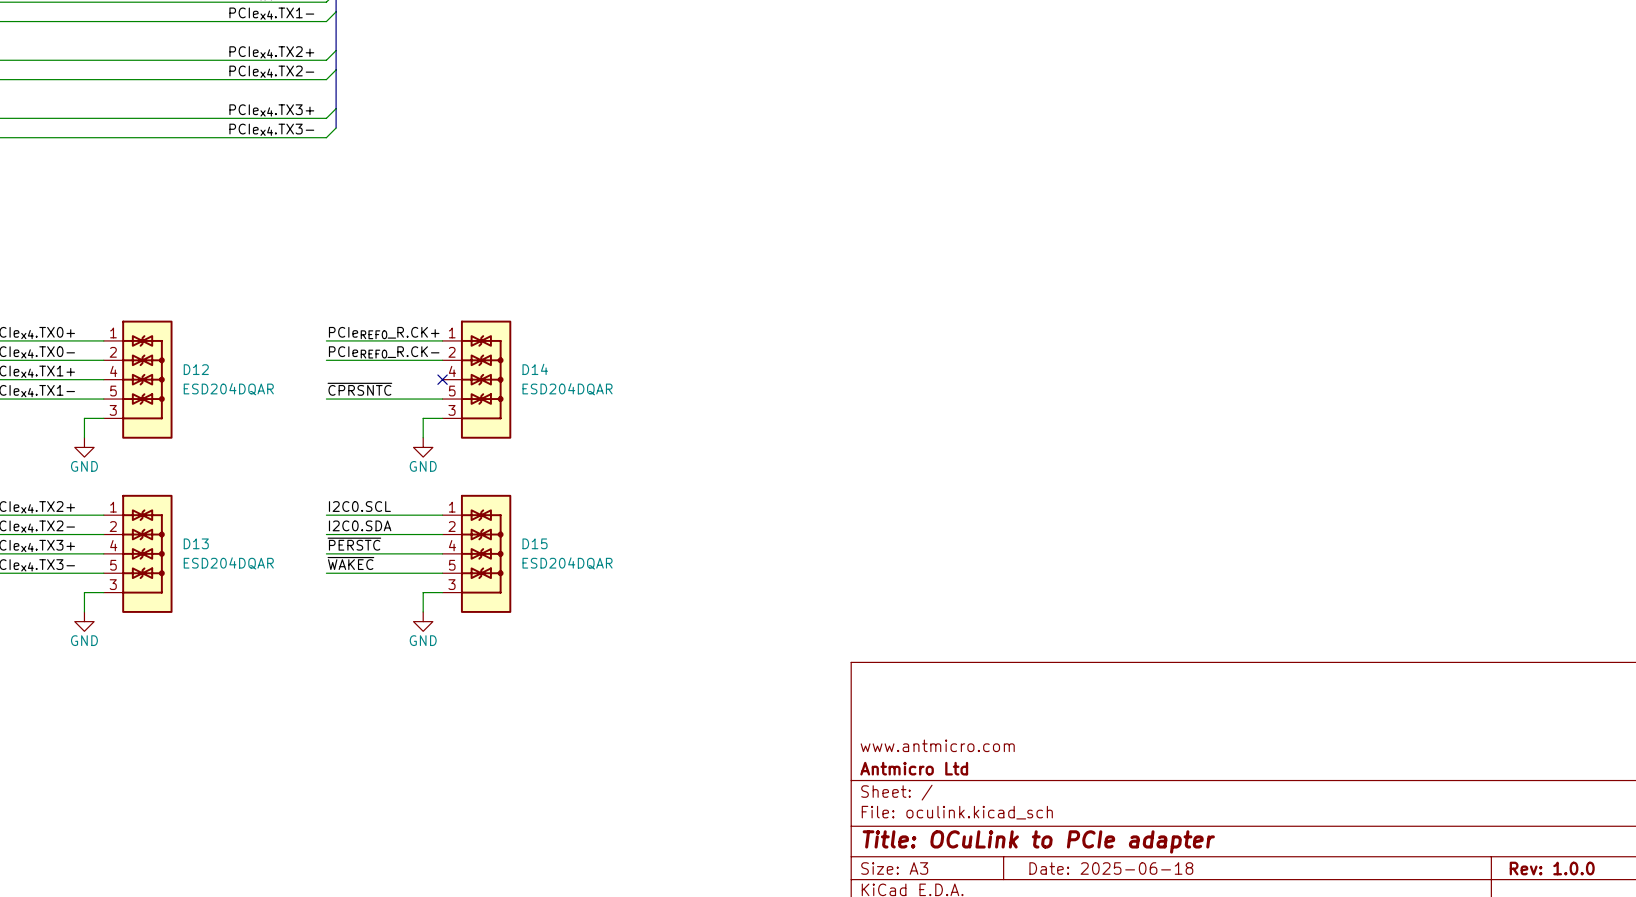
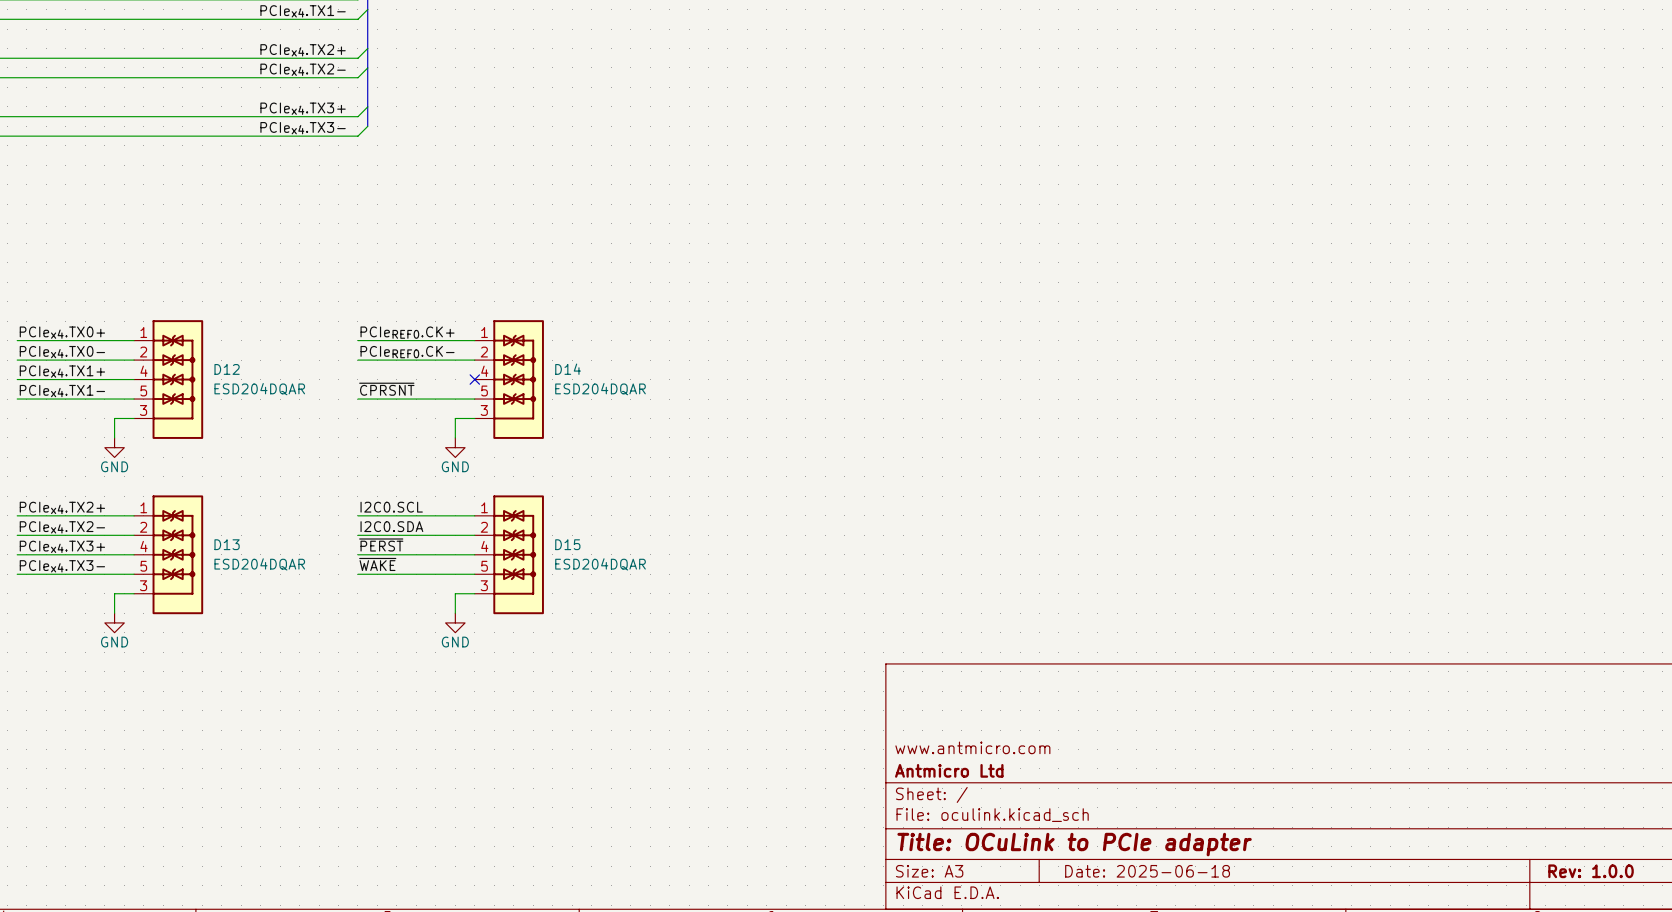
label: PCIeREF0_R.CK+ (384, 333) -> PCIeREF0.CK+ (407, 332)
label: PCIeREF0_R.CK- (384, 352) -> PCIeREF0.CK- (407, 352)
label: ~{CPRSNTC} (359, 389) -> ~{CPRSNT} (386, 389)
label: ~{PERSTC} (354, 544) -> ~{PERST} (381, 544)
label: ~{WAKEC} (350, 563) -> ~{WAKE} (377, 564)

